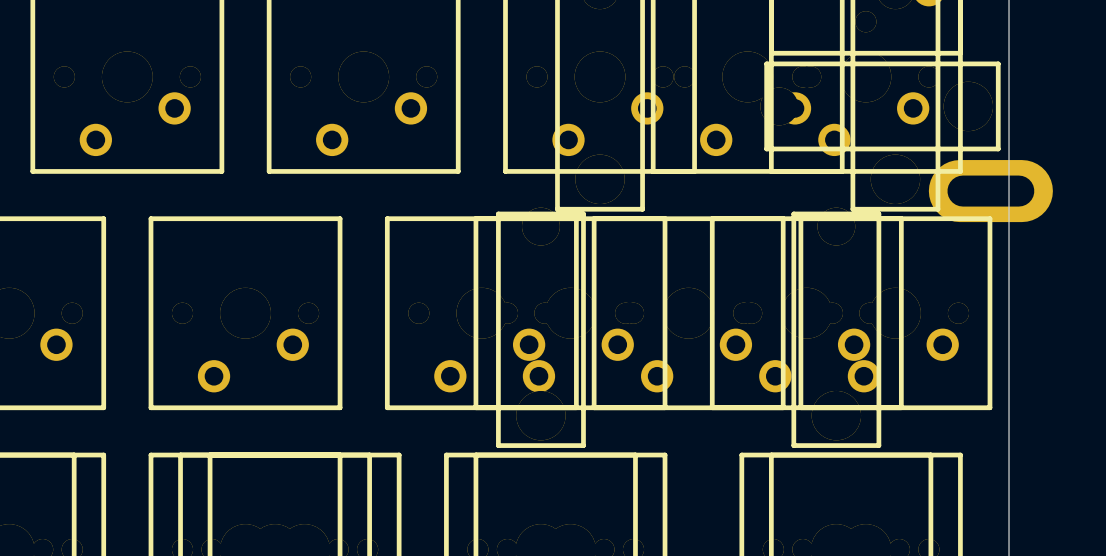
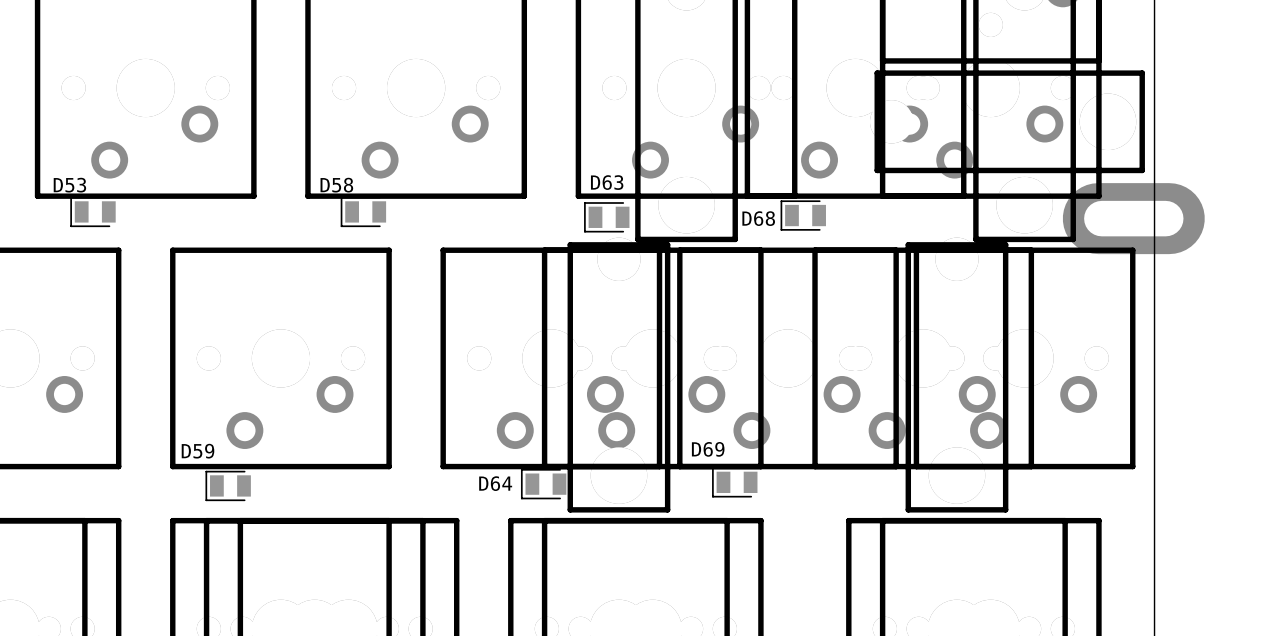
D53: none -> (92, 211)
D58: none -> (363, 211)
D68: none -> (803, 215)
D63: none -> (606, 217)
D69: none -> (734, 482)
D64: none -> (543, 484)
D59: none -> (228, 485)

